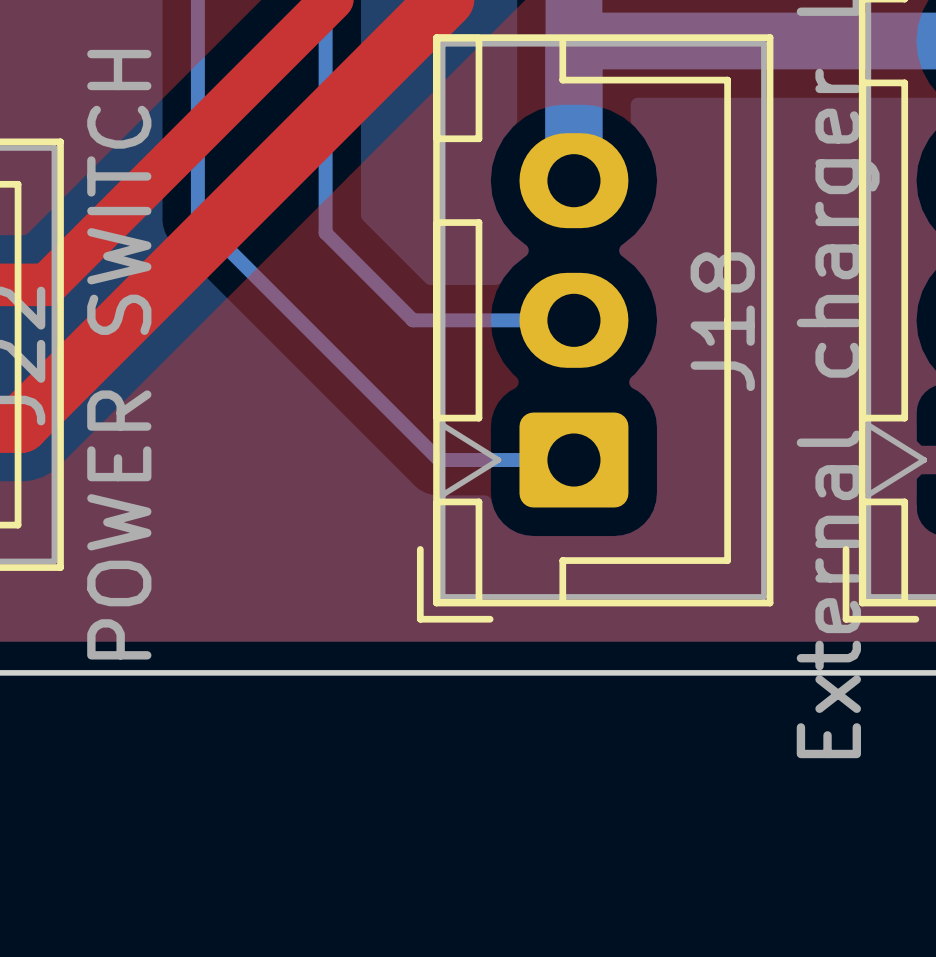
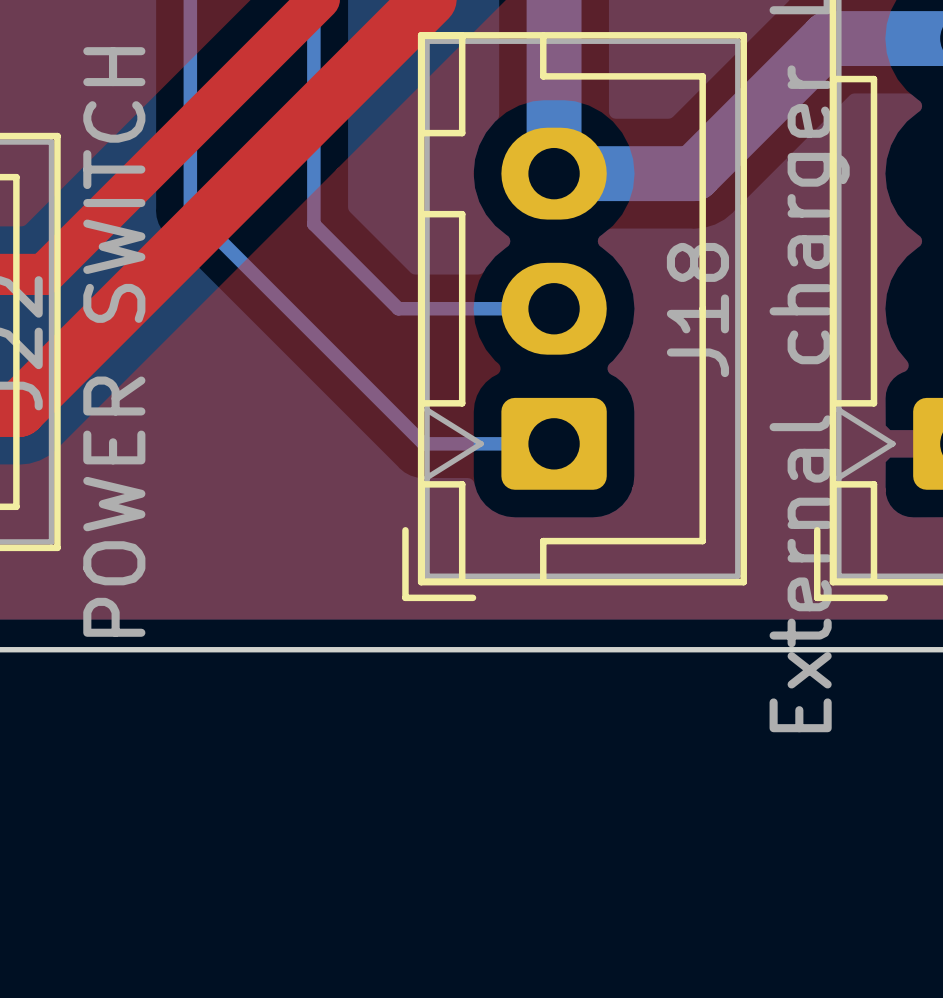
bottom track: (573, 40) (858, 40) -> (554, 173) (693, 173) (828, 38)

